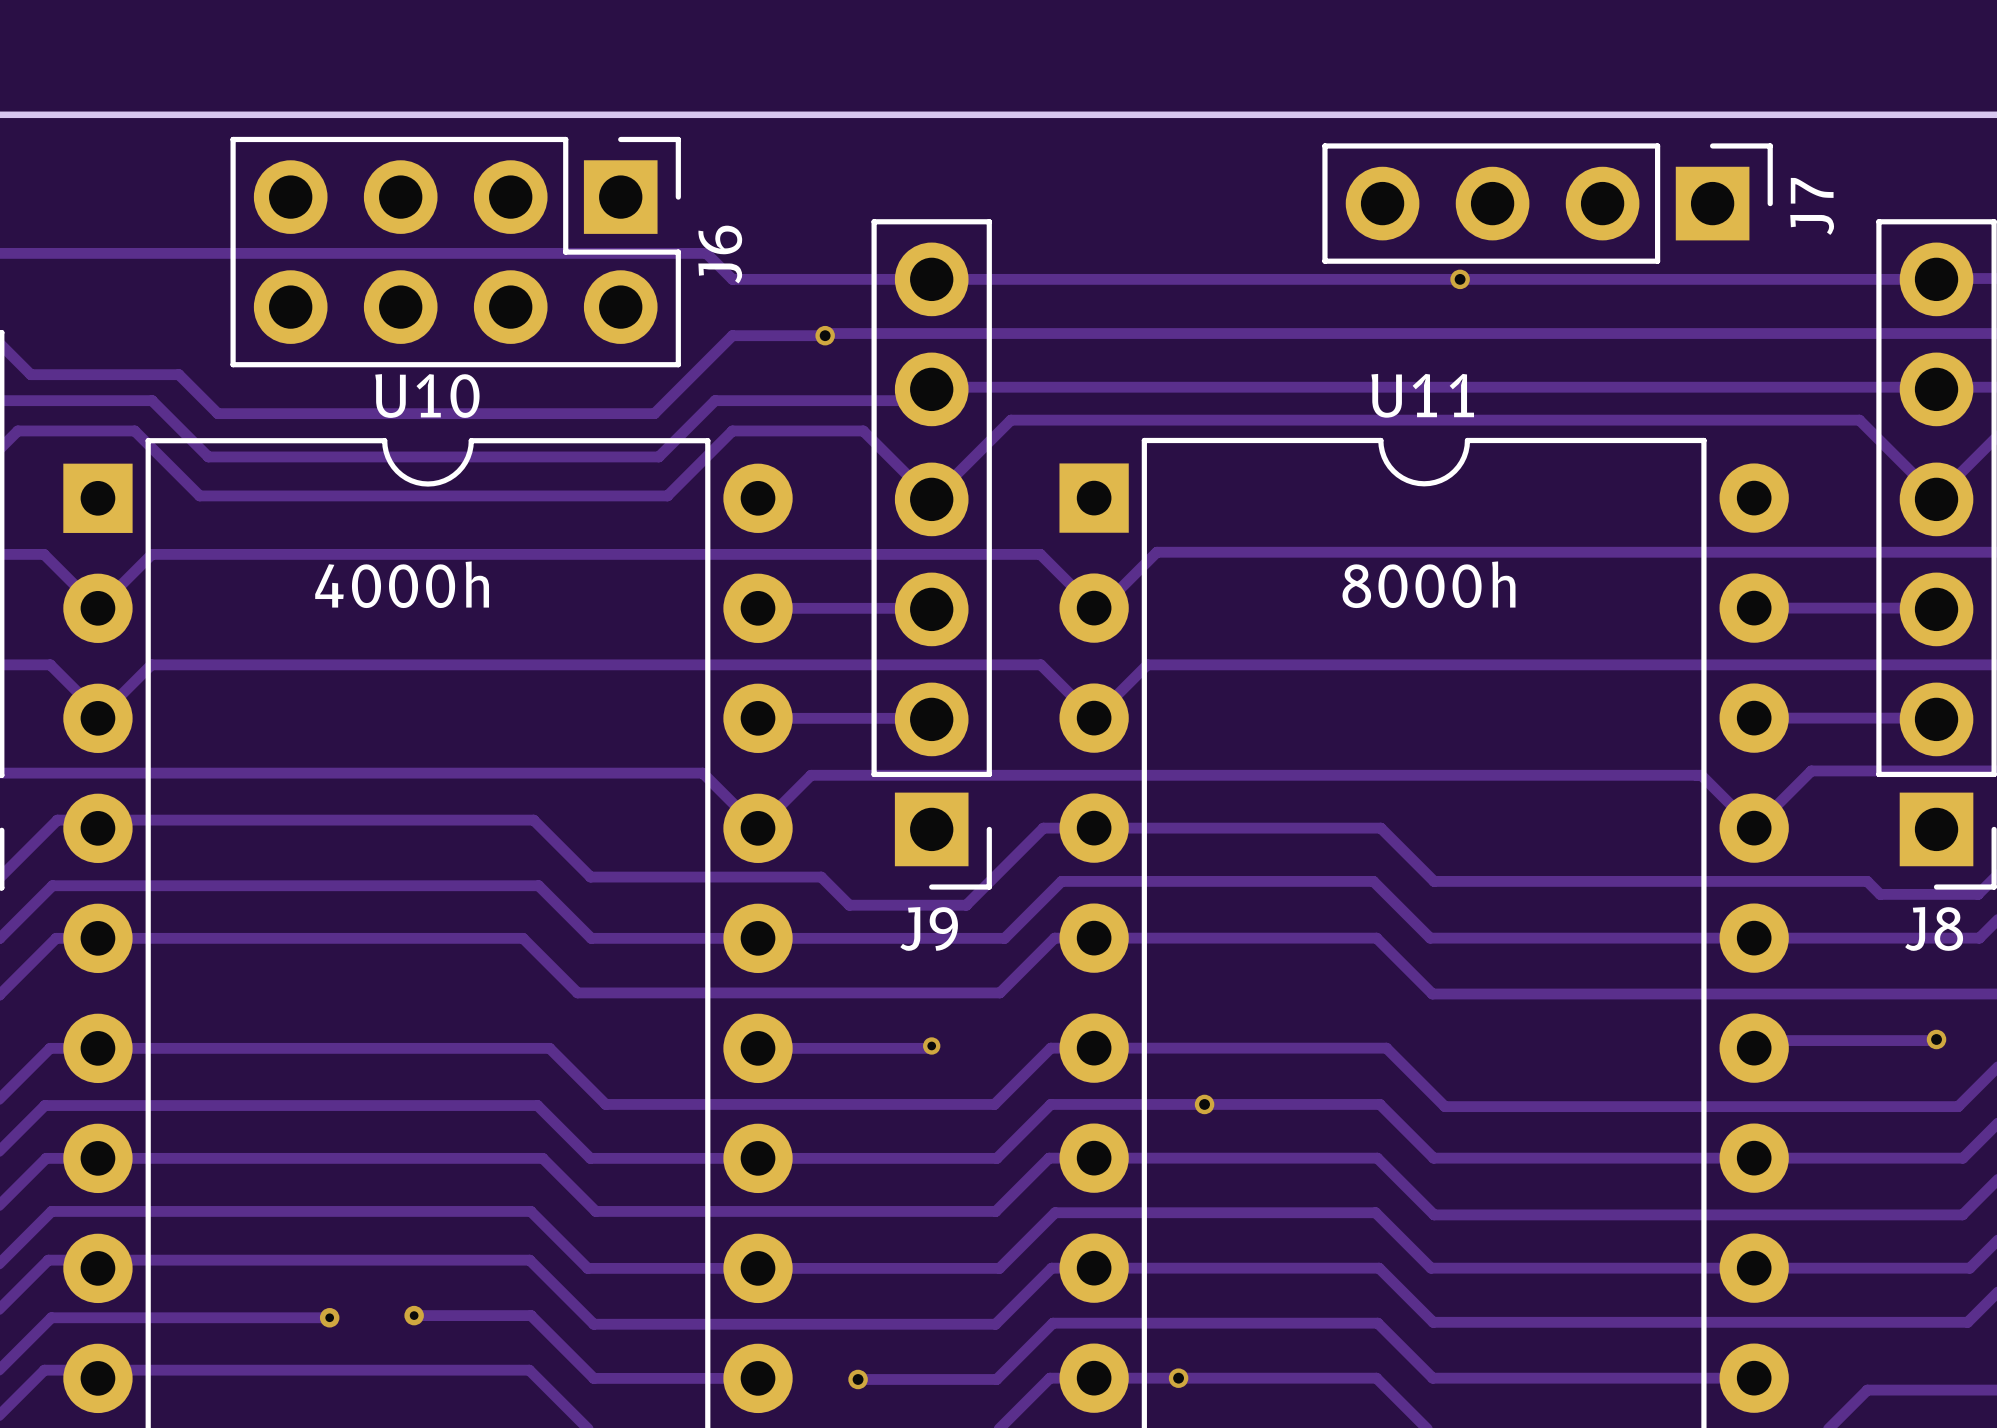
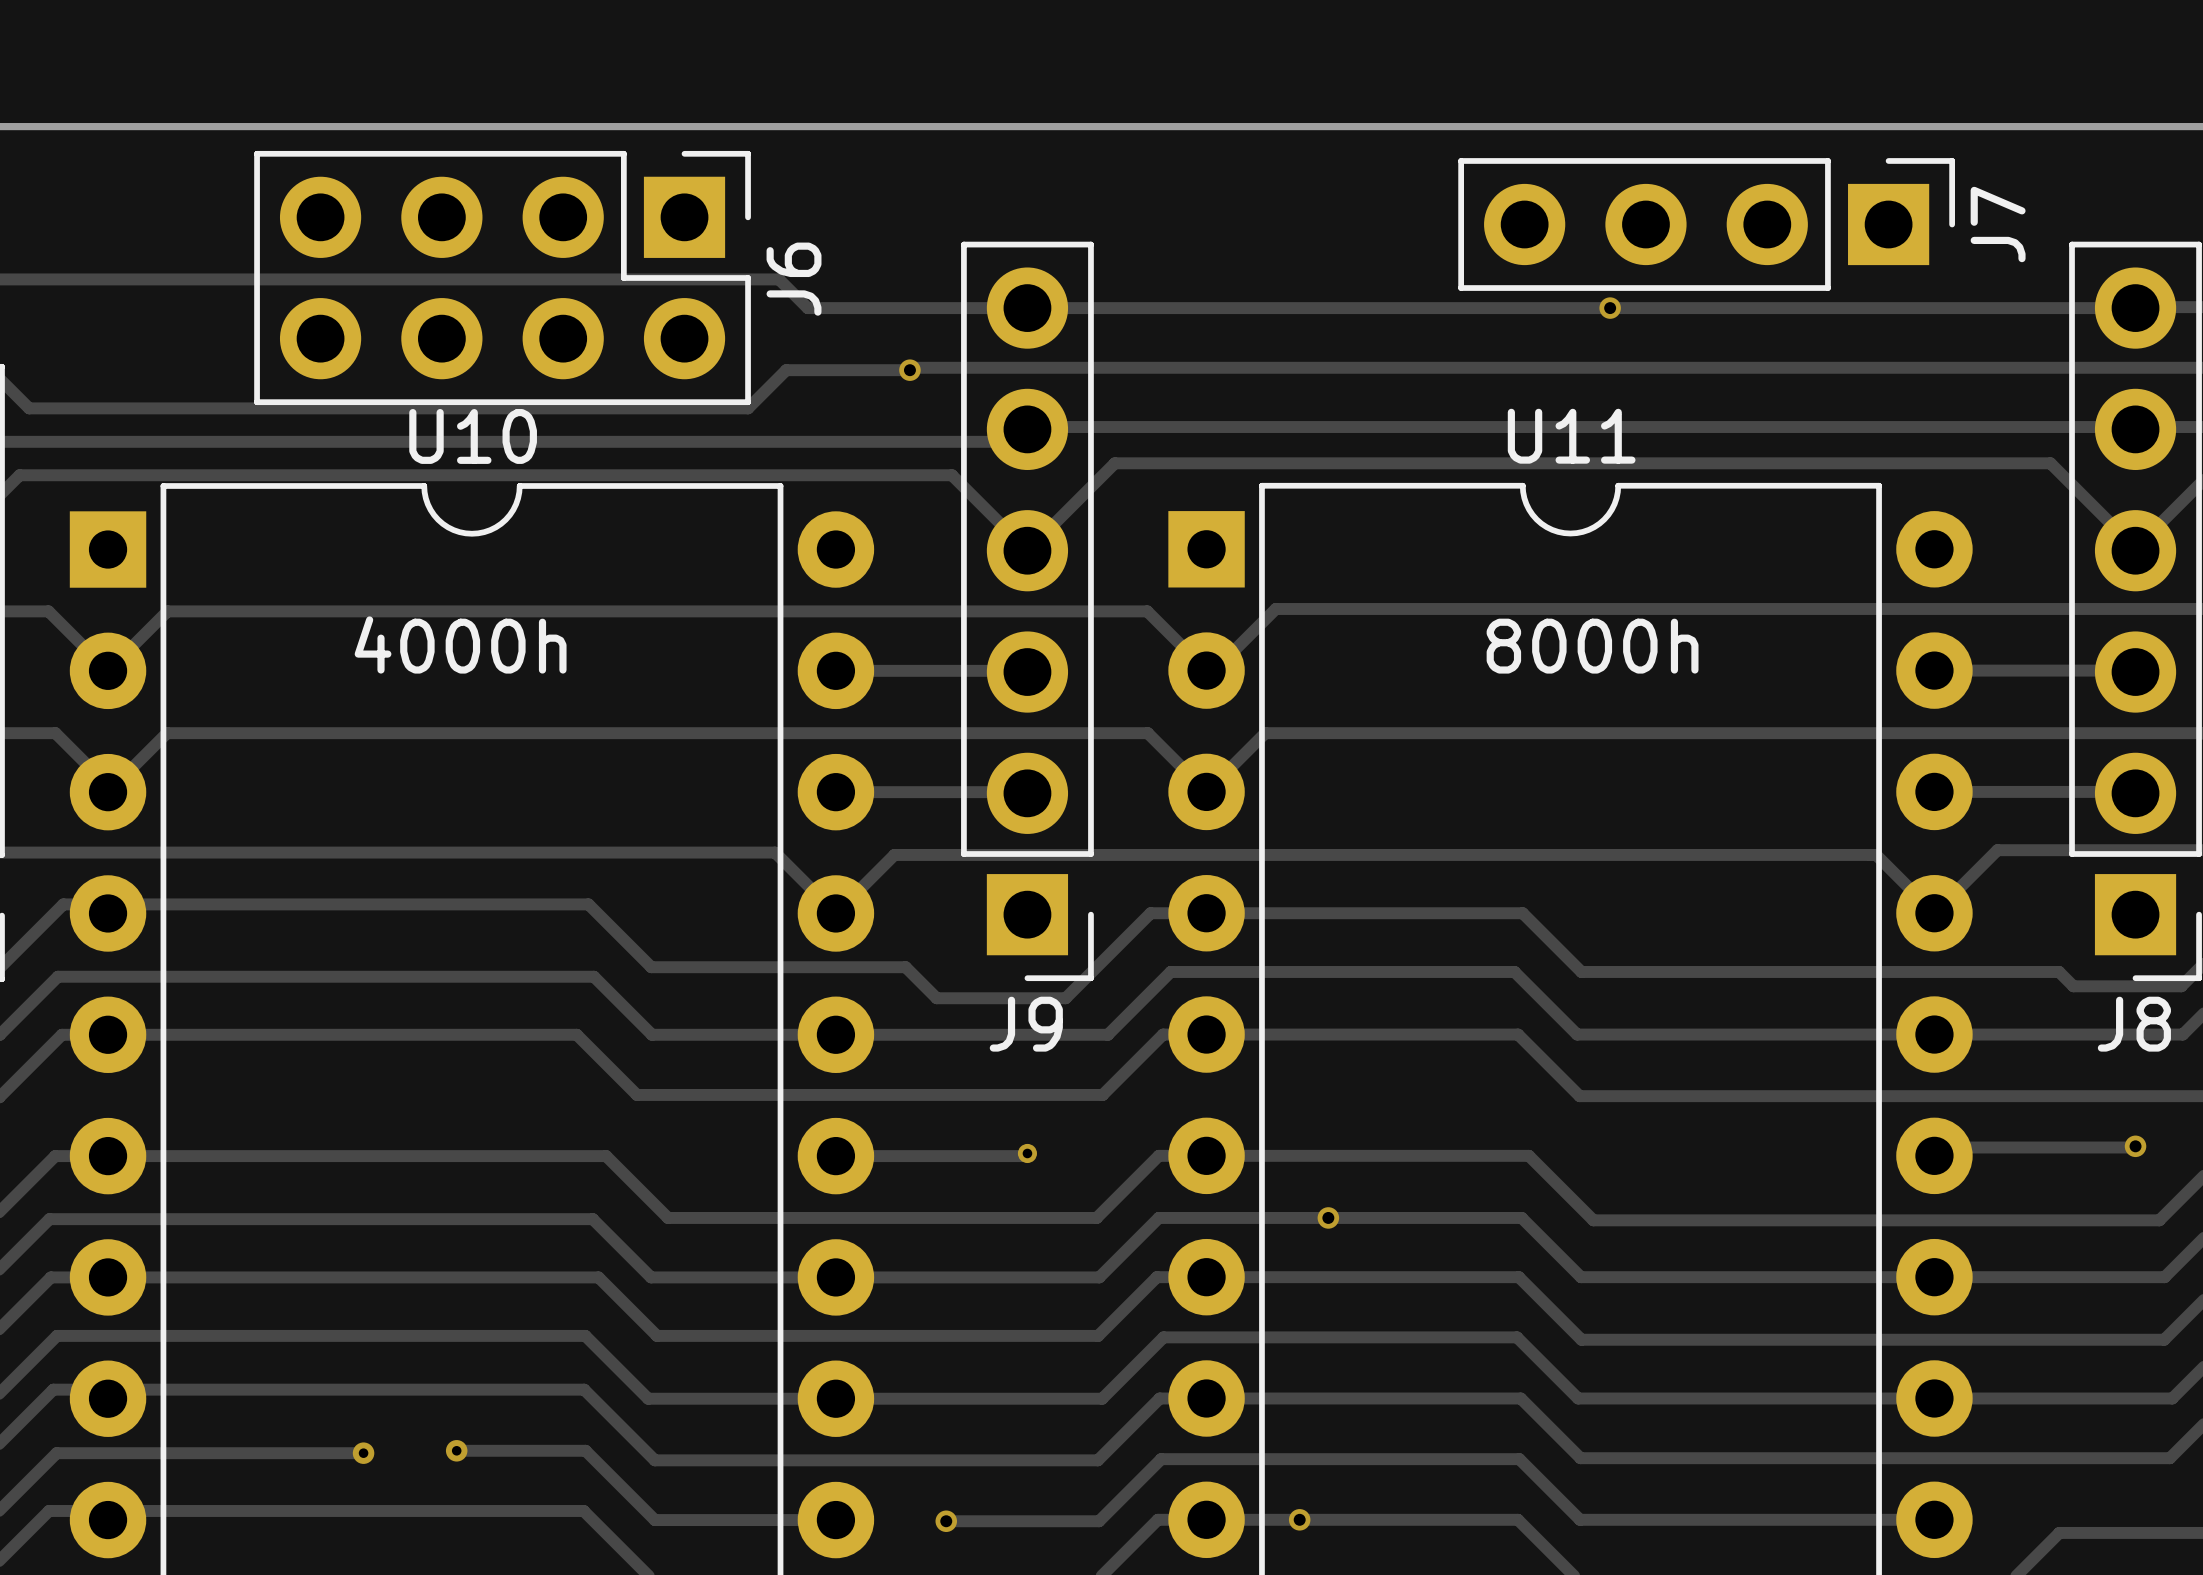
track: (732, 335) (654, 413) (217, 413) (178, 374) (30, 374) (26, 370) -> (807, 370) (786, 370) (748, 408) (29, 408)
track: (152, 400) (208, 456) (658, 456) (715, 400) -> (167, 441) (788, 441)
track: (134, 430) (199, 495) (667, 495) (732, 430) -> (148, 475) (807, 475)

